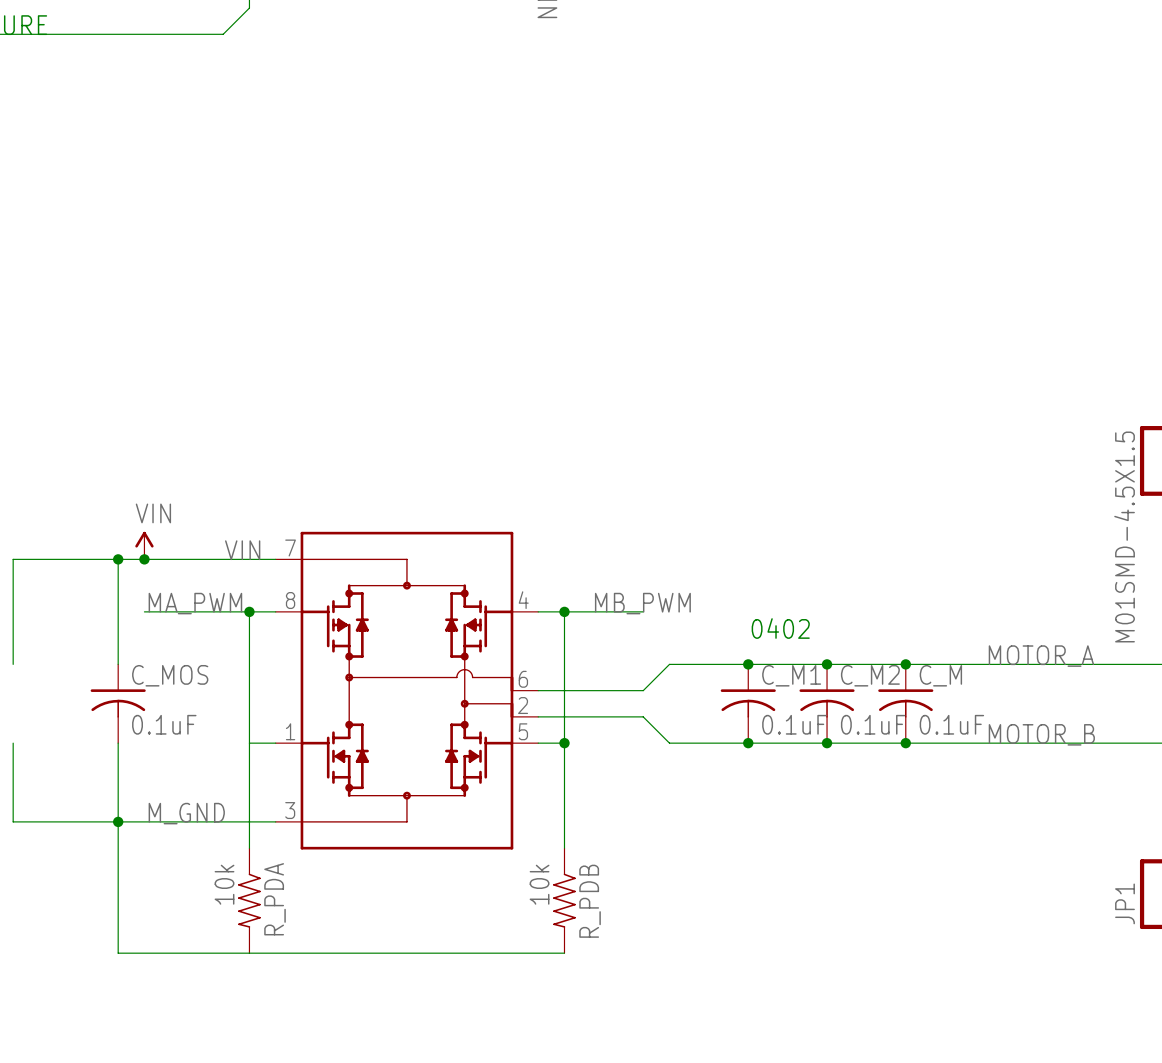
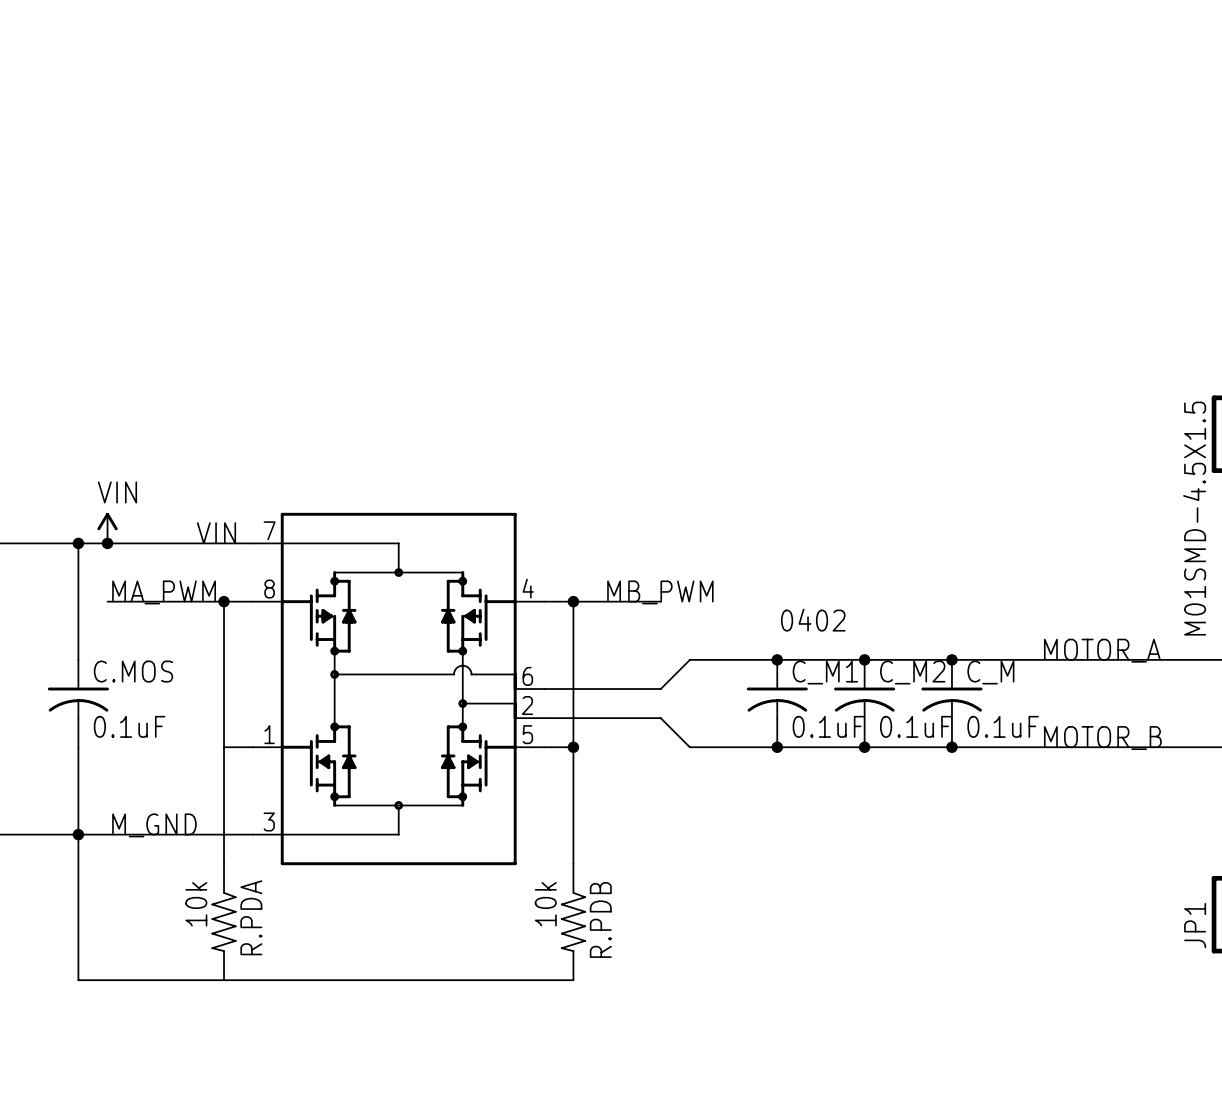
C_MOS name: C_MOS (170, 675) -> C.MOS (133, 671)
R_PDA name: R_PDA (275, 899) -> R.PDA (251, 917)
R_PDB name: R_PDB (590, 901) -> R.PDB (600, 919)

